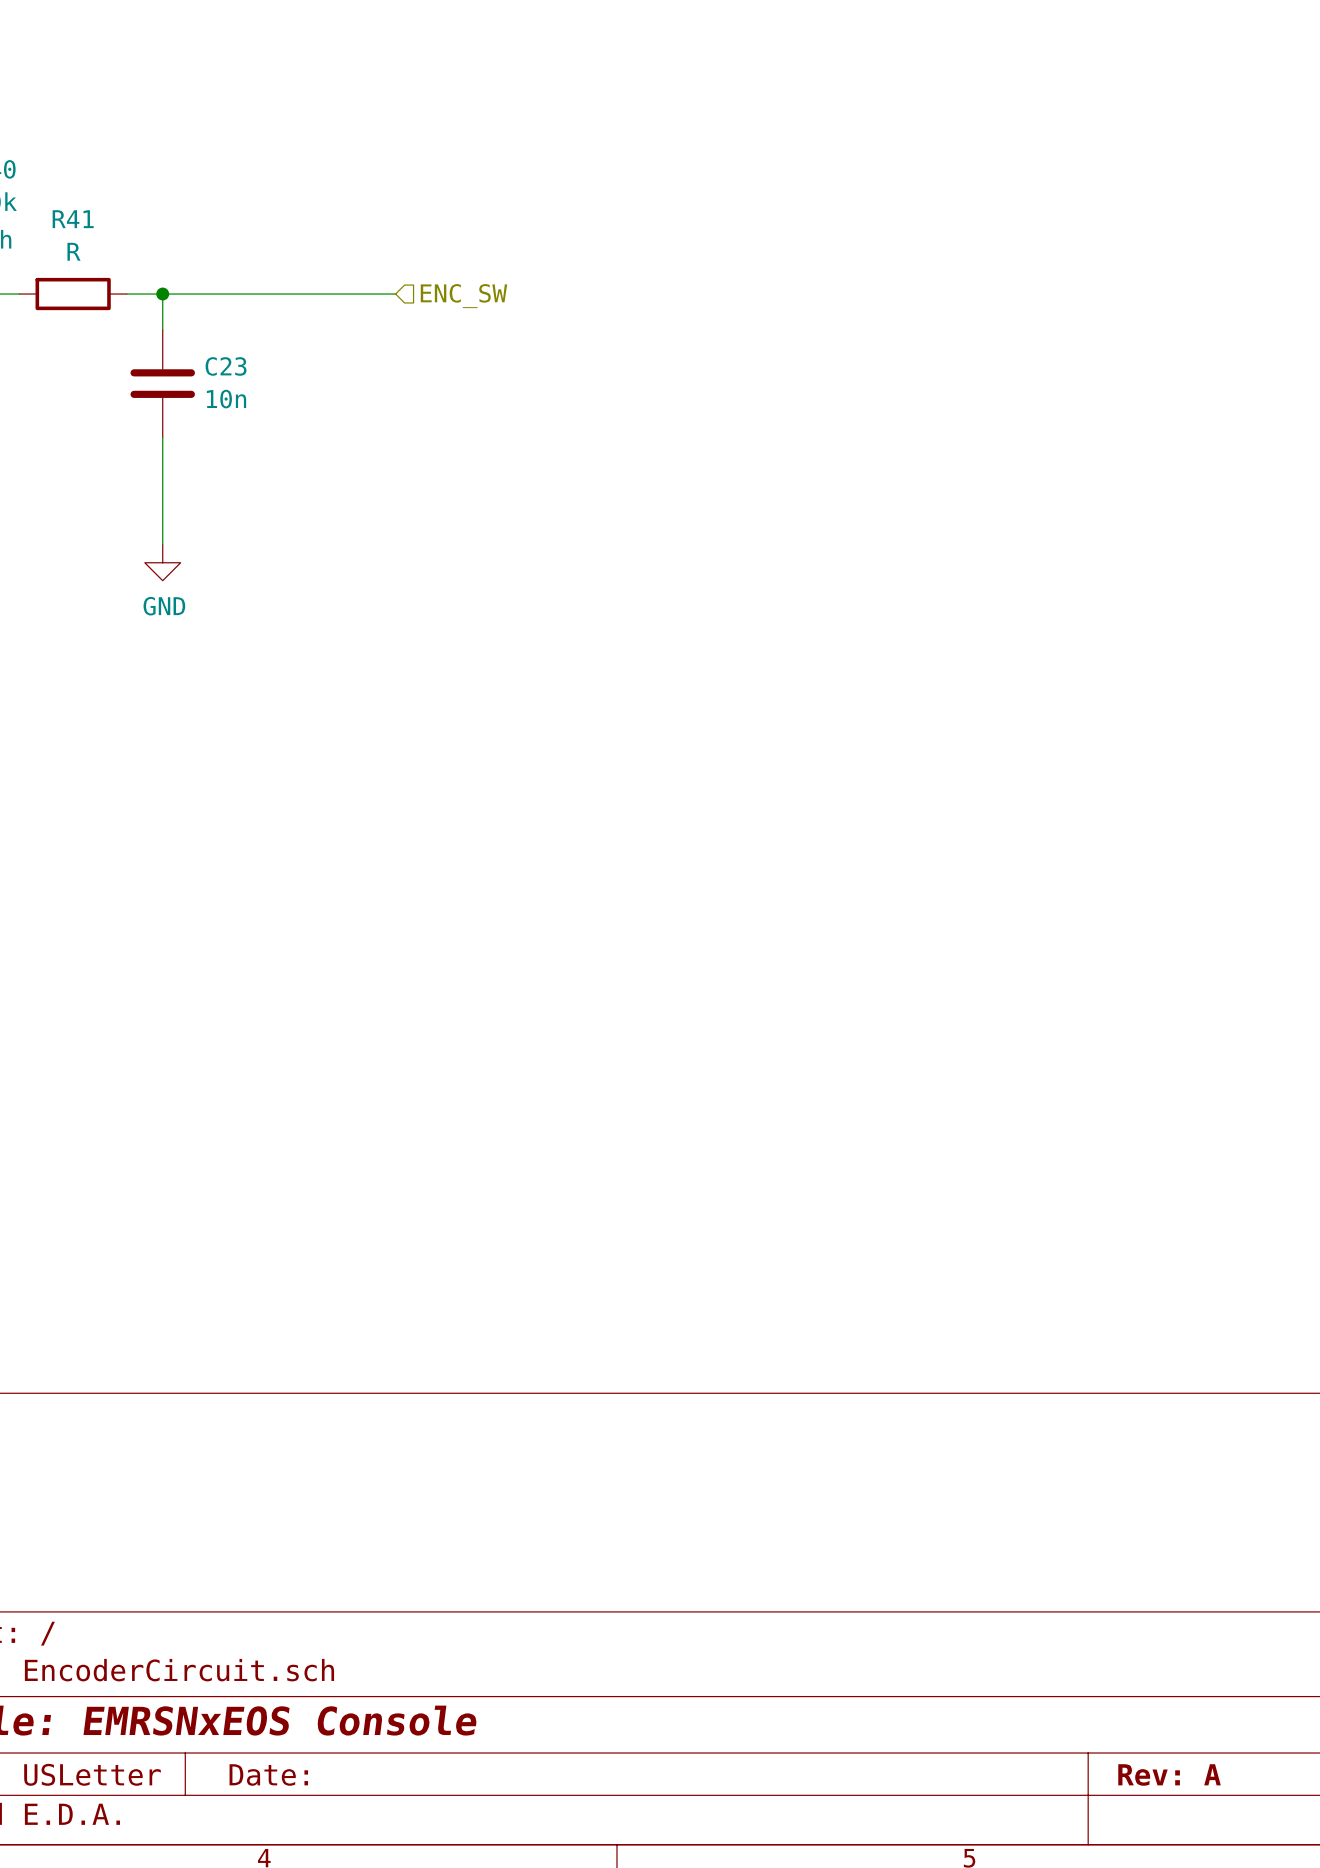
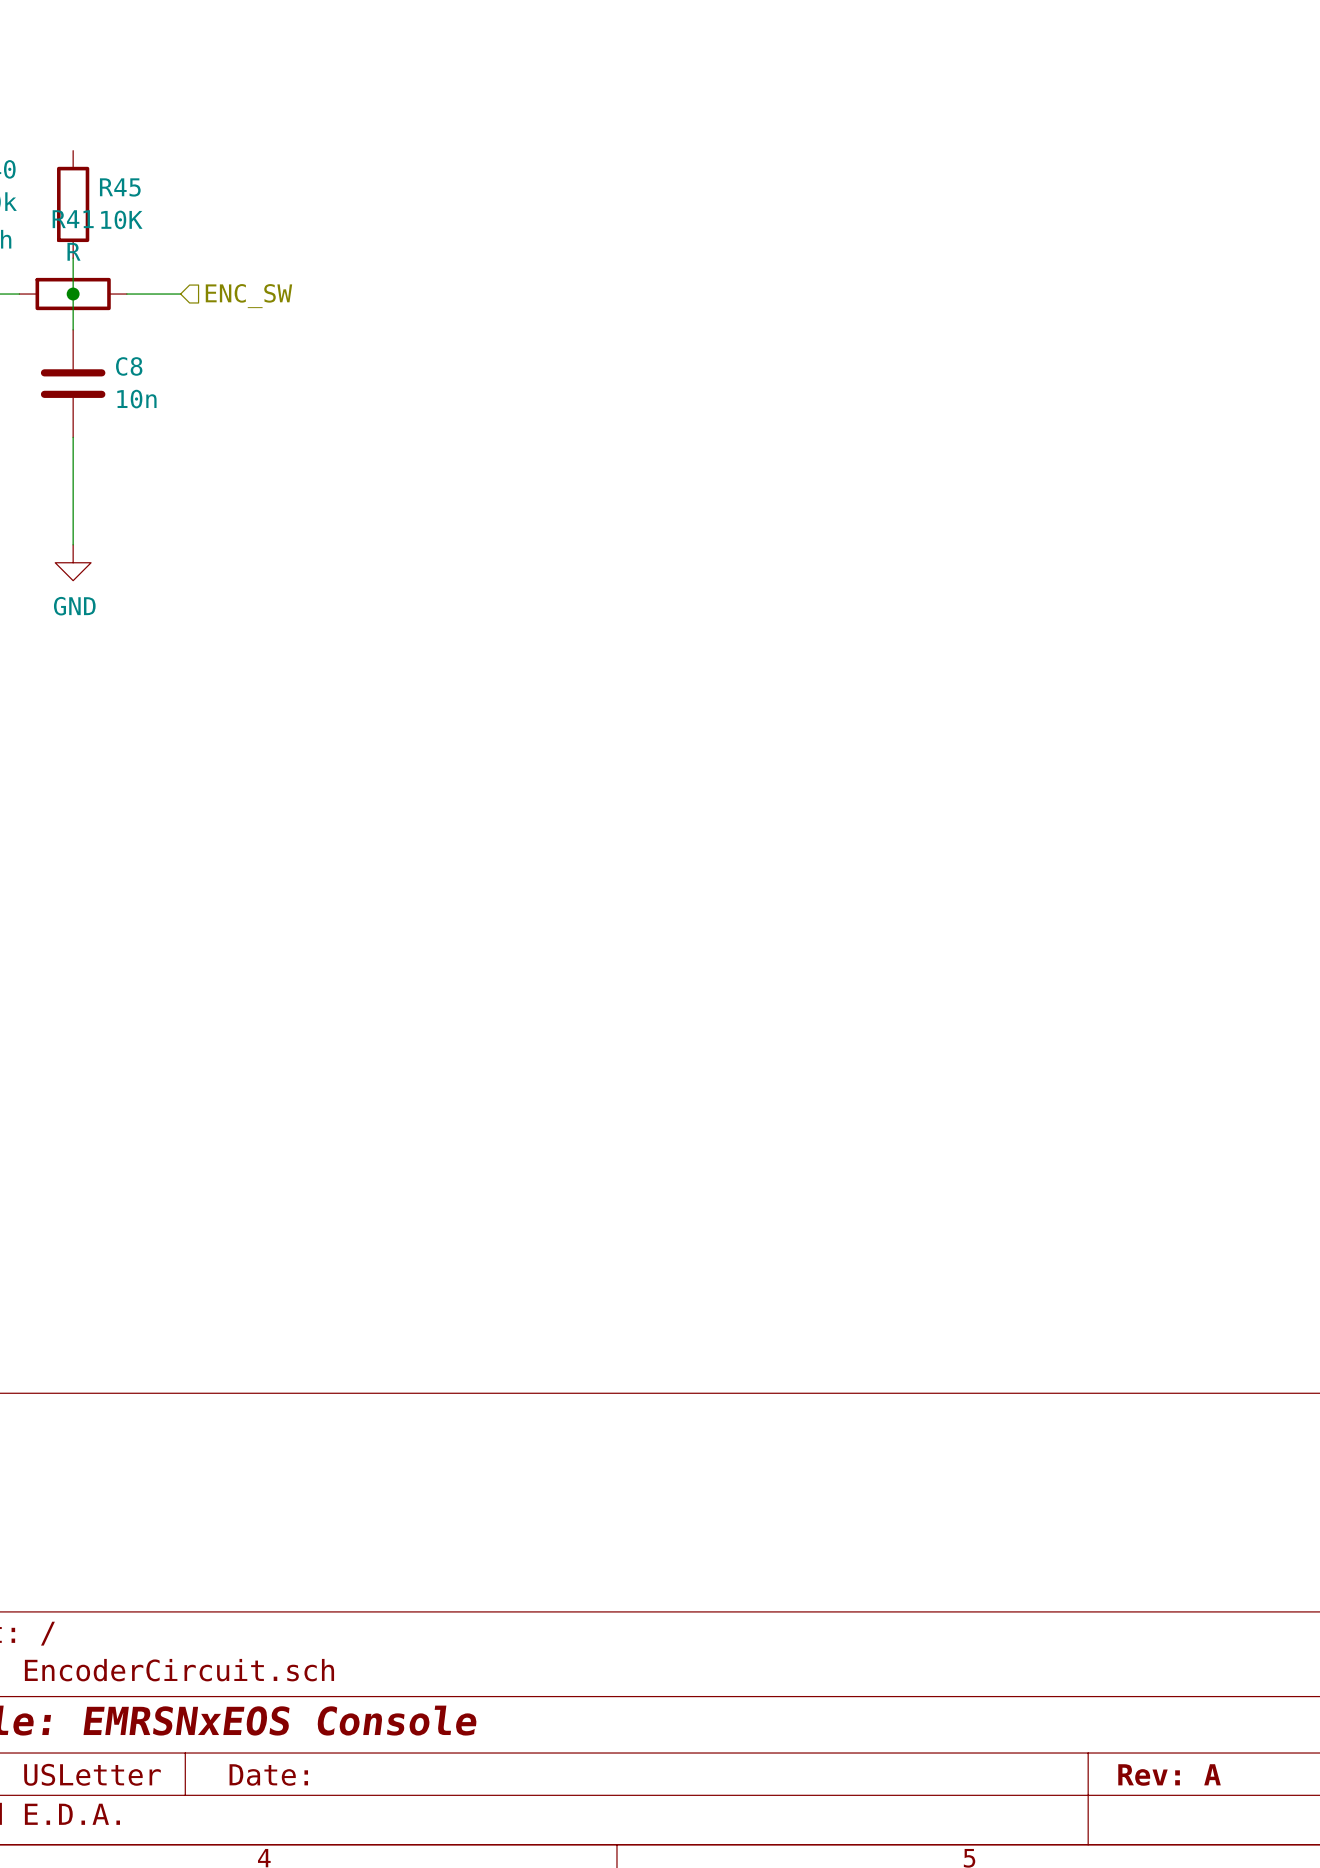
R45: none -> 10K (73, 204)
wire: none -> (73, 258) (73, 329)
junction: none -> (73, 294)
wire: (162, 294) (162, 329) -> none
junction: (162, 294) -> none
wire: (180, 294) (395, 294) -> none
hierarchical label position: ENC_SW (463, 296) -> ENC_SW (248, 296)
C8: none -> 10n (73, 383)
C23: 10n (162, 383) -> none
wire: (162, 437) (162, 544) -> (73, 437) (73, 544)
power symbol: none -> GND (73, 562)
power symbol: GND (162, 562) -> none

